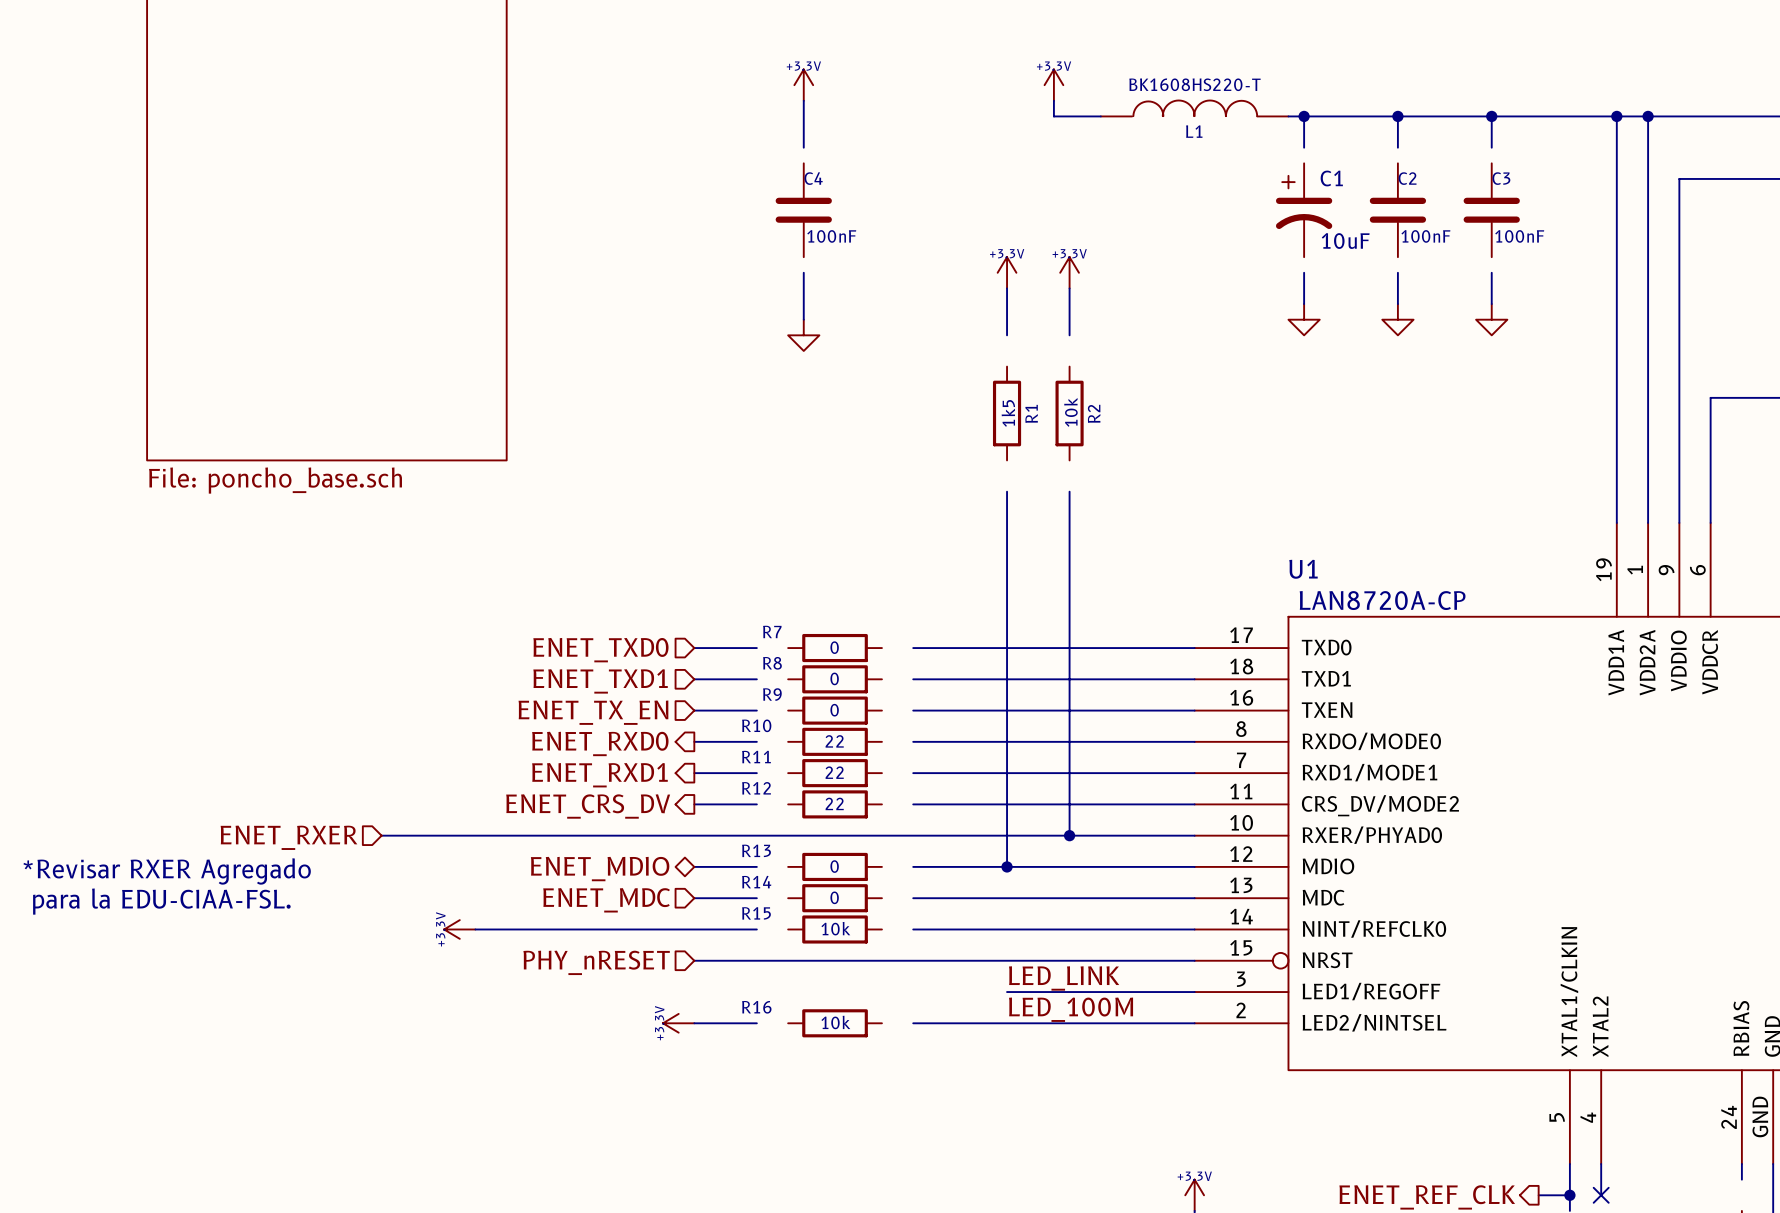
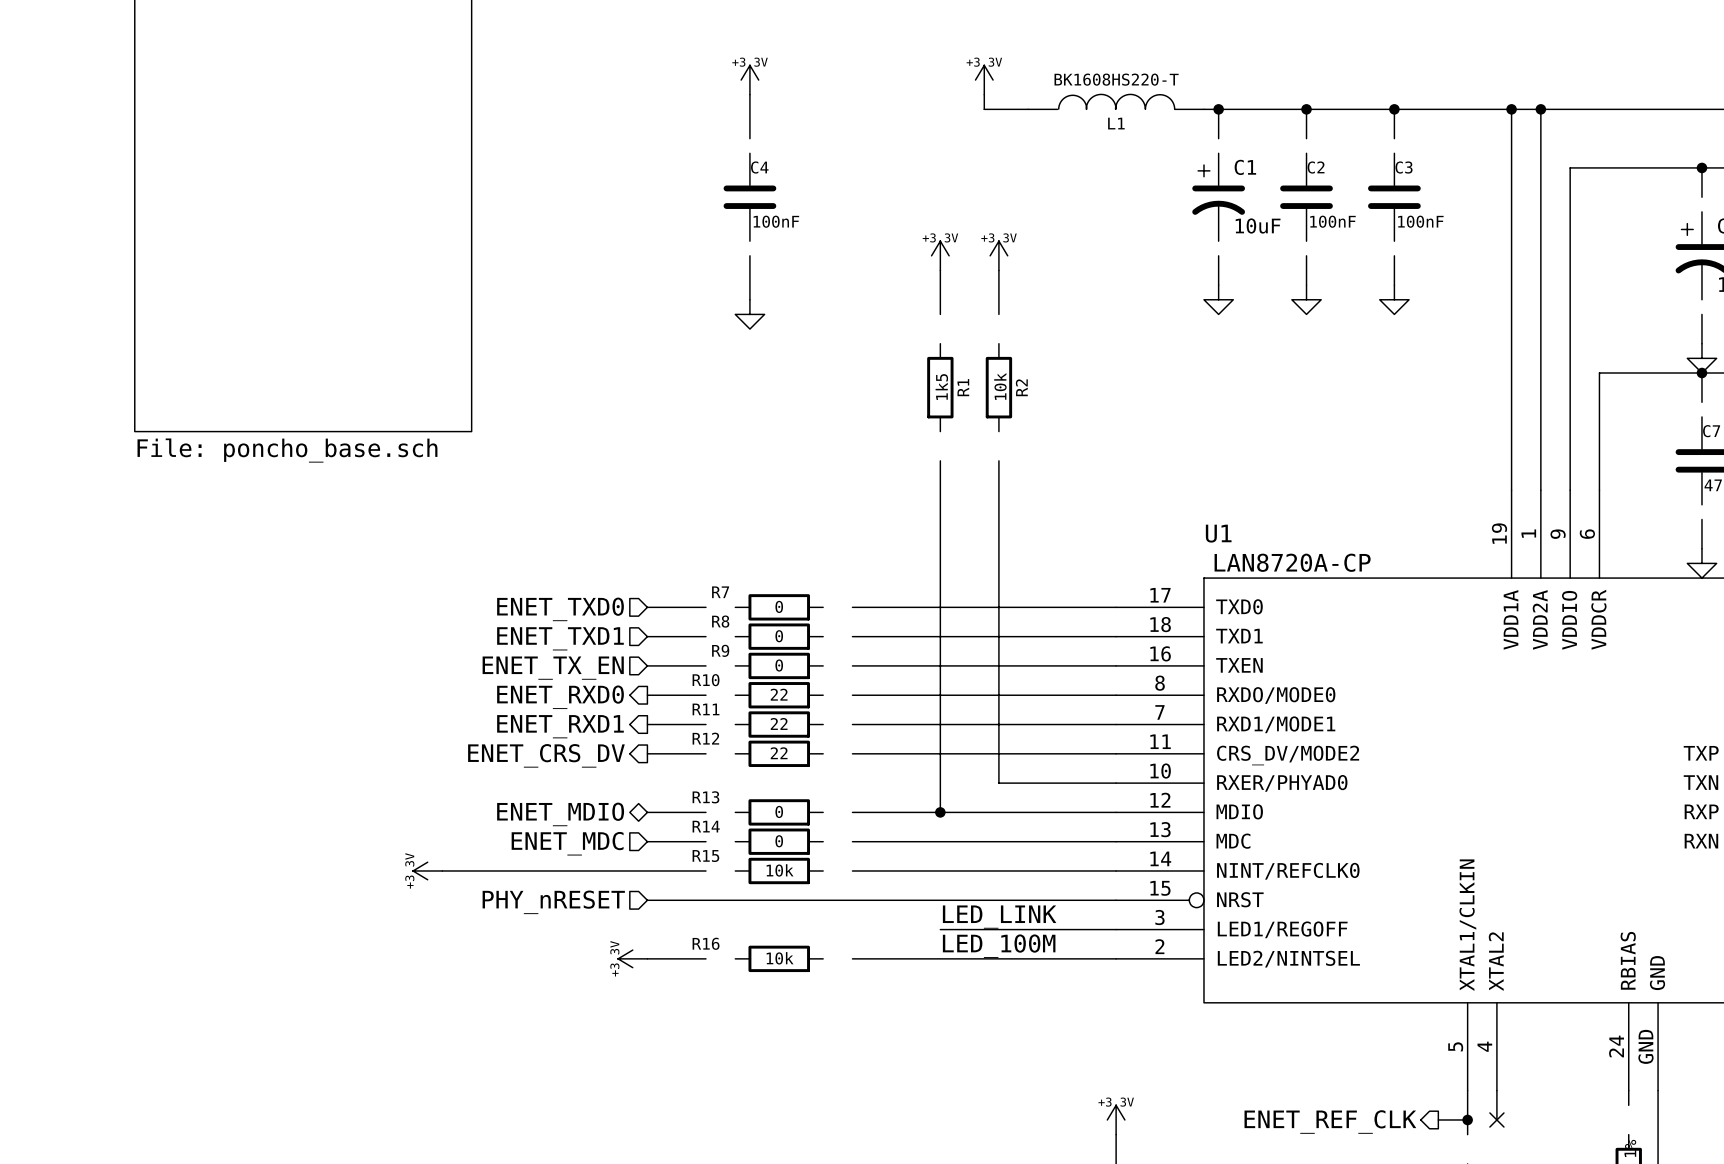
wire: (381, 835) (1069, 835) -> none
junction: (1069, 835) -> none
hierarchical label: ENET_RXER (288, 837) -> none
text: *Revisar RXER Agregado (167, 871) -> none
text: para la EDU-CIAA-FSL. (161, 901) -> none

